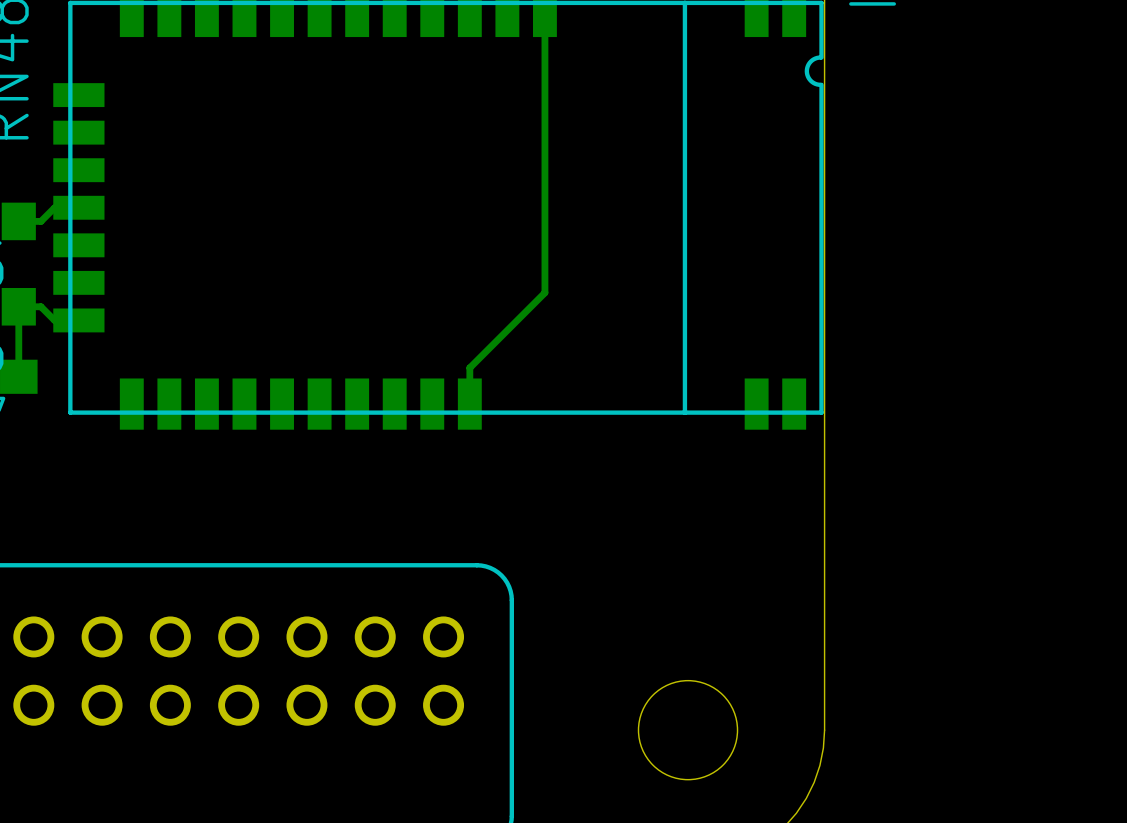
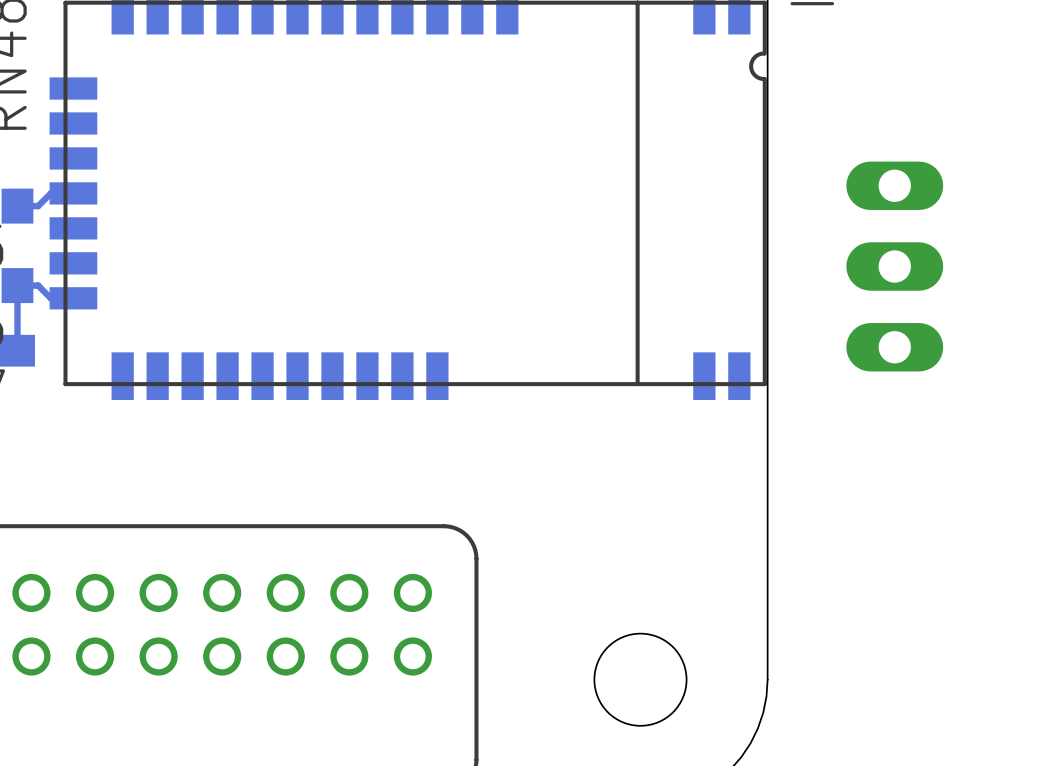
bottom track: (544, 11) (544, 292) (469, 367) (469, 404) -> none
part: none -> (894, 266)

